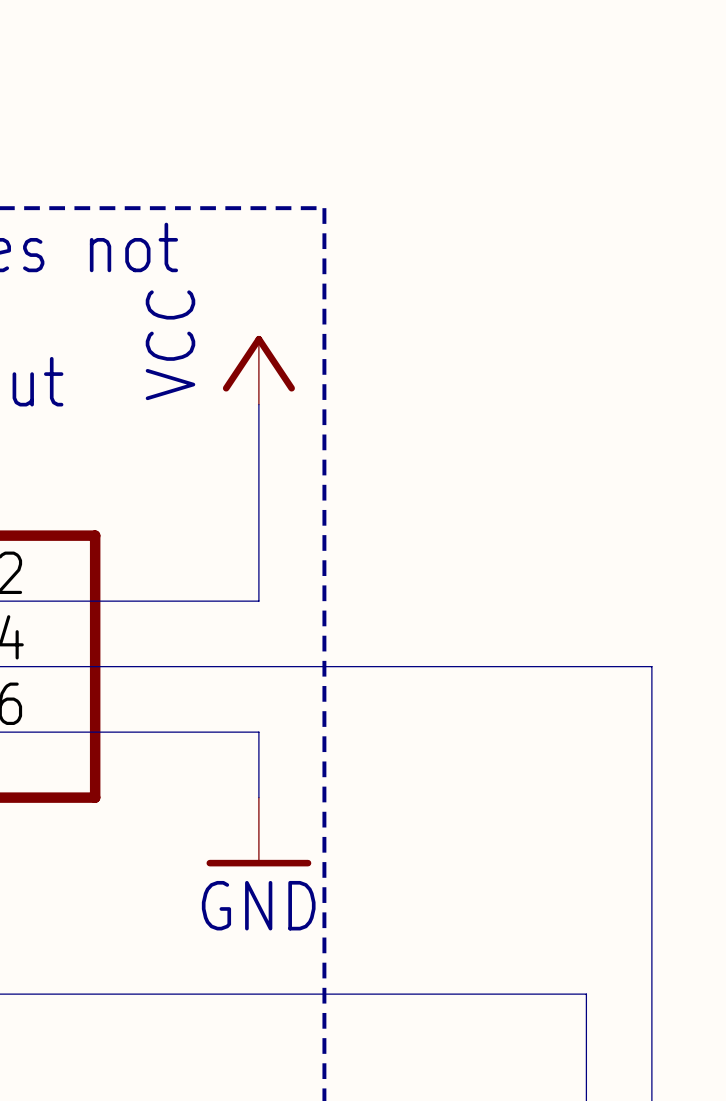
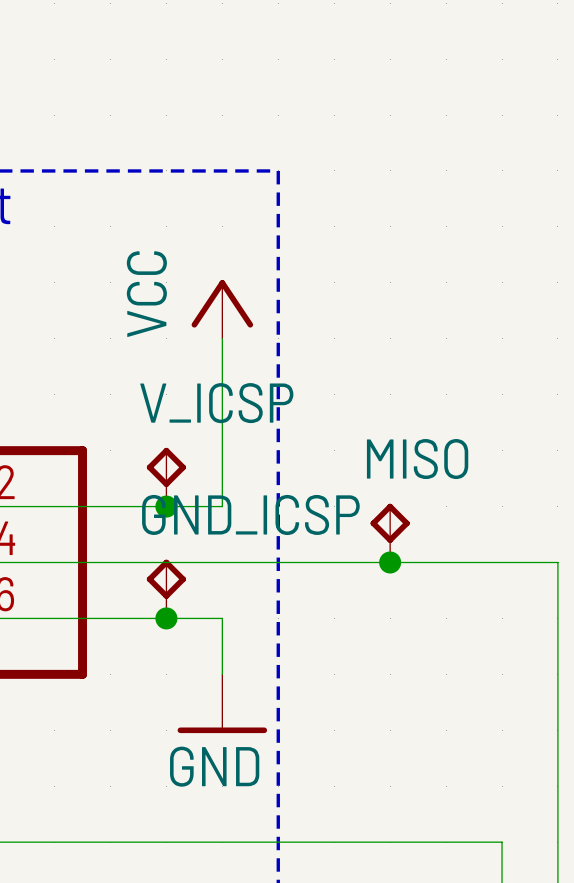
V_ICSP: none -> (166, 477)
junction: none -> (166, 506)
MISO: none -> (390, 533)
junction: none -> (390, 562)
GND_ICSP: none -> (166, 589)
junction: none -> (166, 618)

